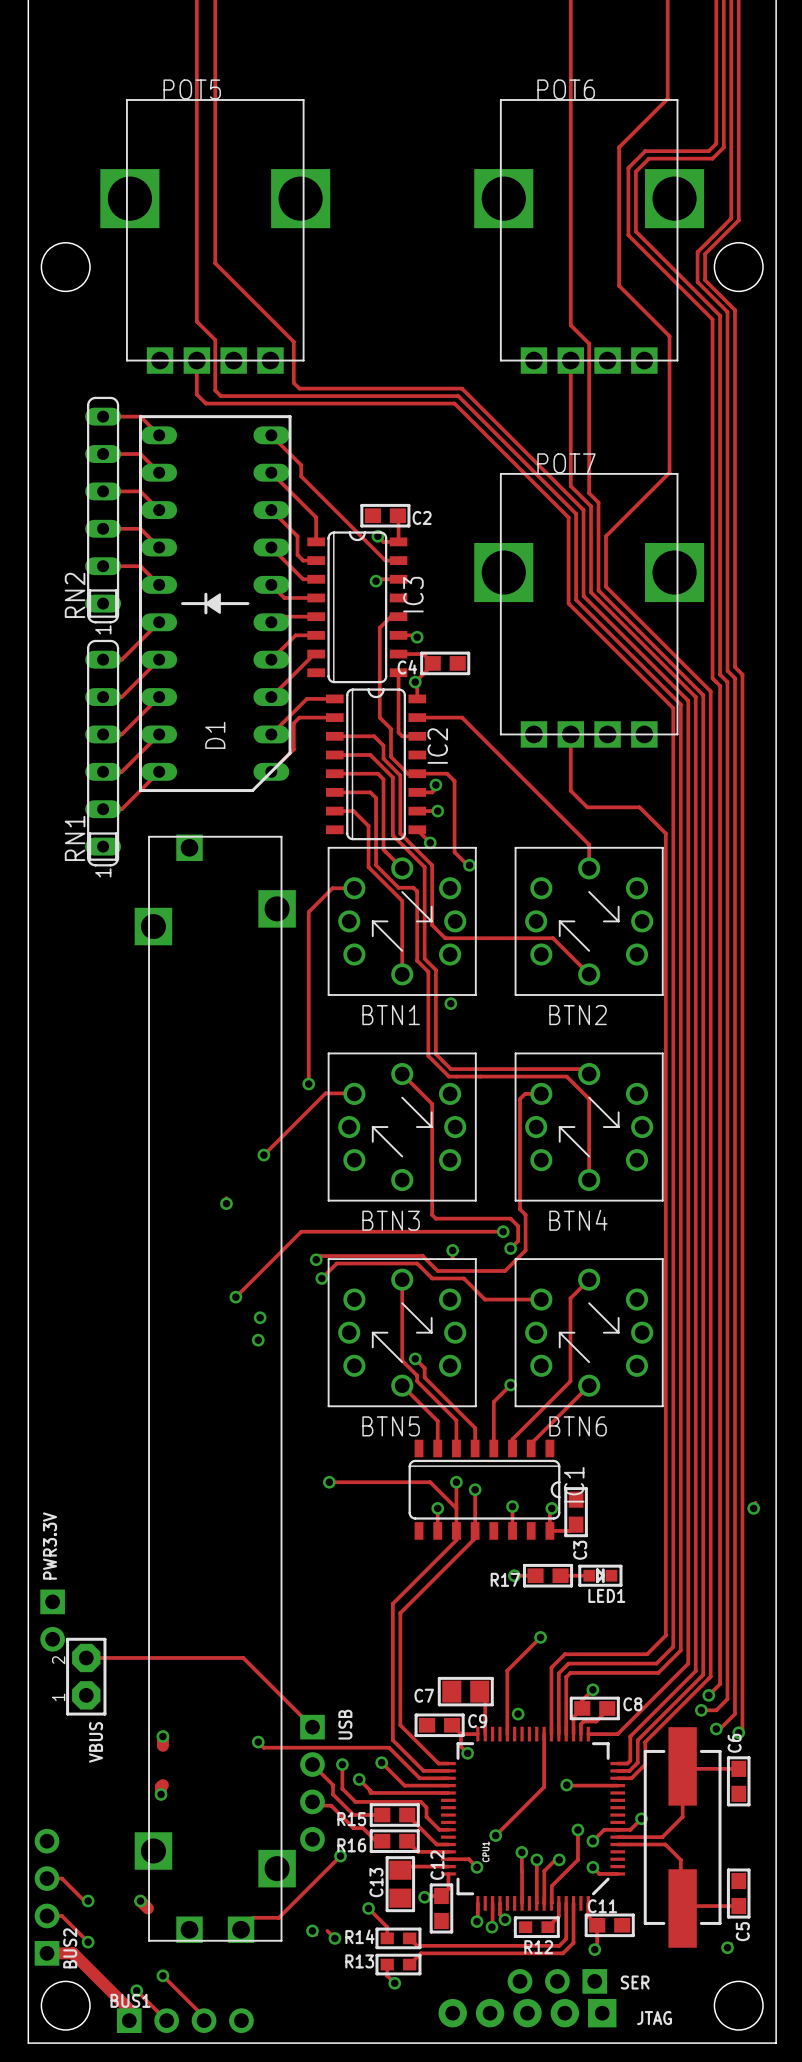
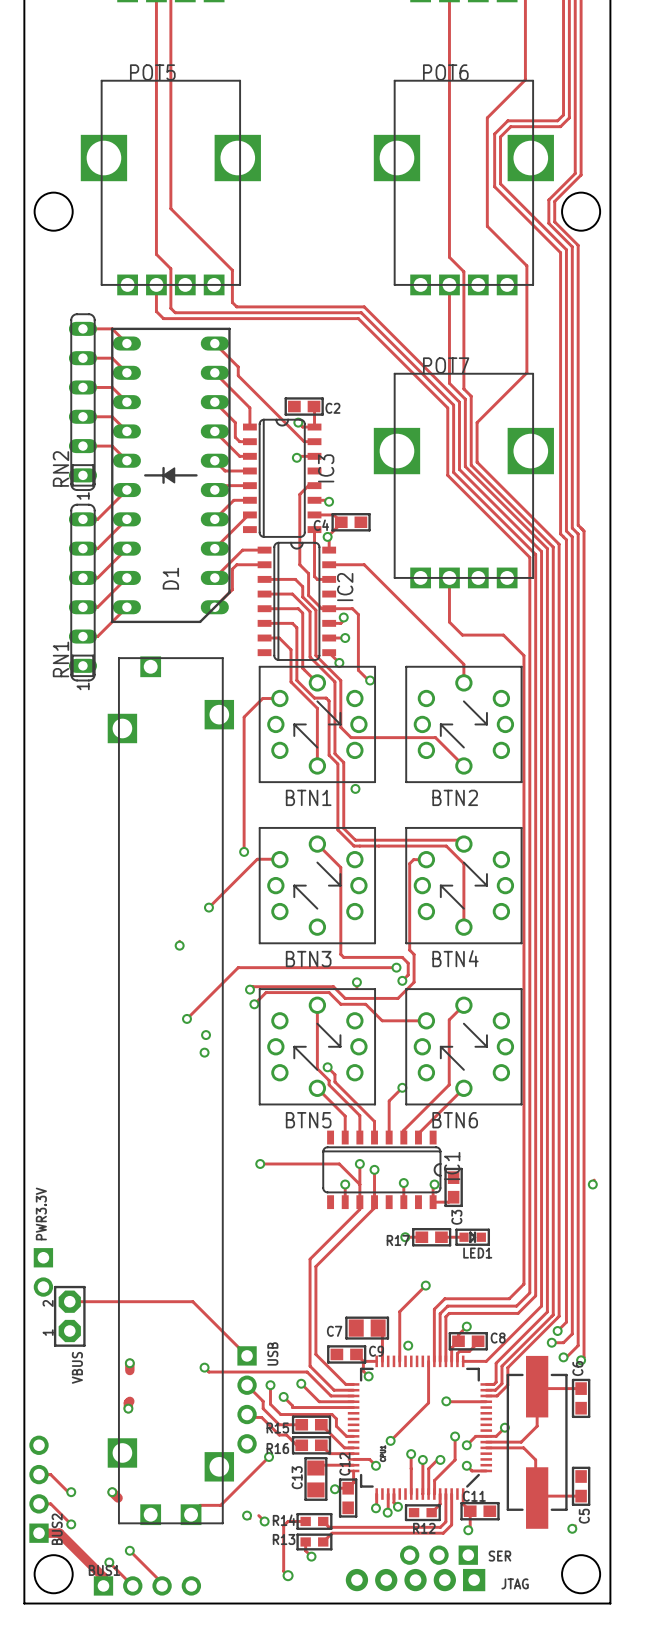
track: (368, 1908) (387, 1927) (387, 1938) -> (288, 1575) (283, 1571) (283, 1525) (288, 1521) (305, 1521)
via: (368, 1908) -> none
via: none -> (288, 1575)

